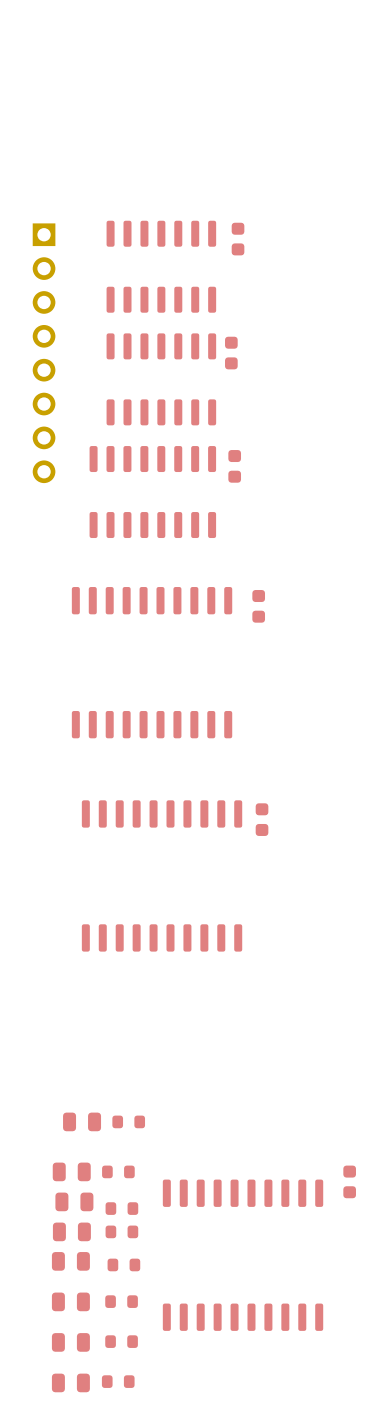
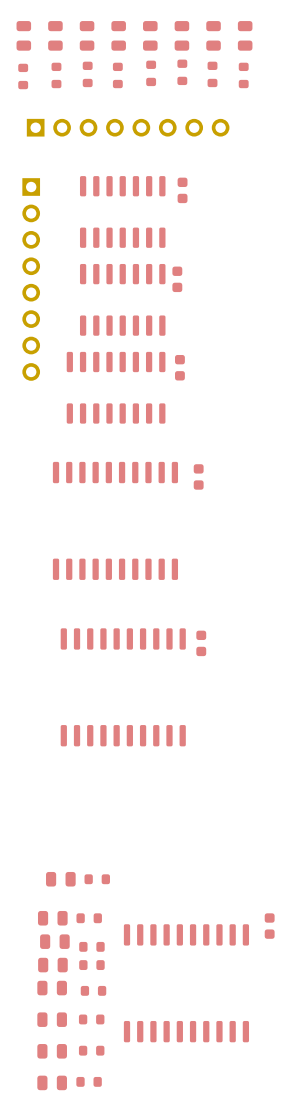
part: none -> (23, 35)
part: none -> (55, 35)
part: none -> (87, 35)
part: none -> (118, 35)
part: none -> (150, 35)
part: none -> (181, 35)
part: none -> (213, 35)
part: none -> (245, 35)
part: none -> (182, 72)
part: none -> (151, 73)
part: none -> (87, 74)
part: none -> (212, 74)
part: none -> (56, 75)
part: none -> (117, 75)
part: none -> (243, 75)
part: none -> (23, 76)
part: none -> (128, 127)

